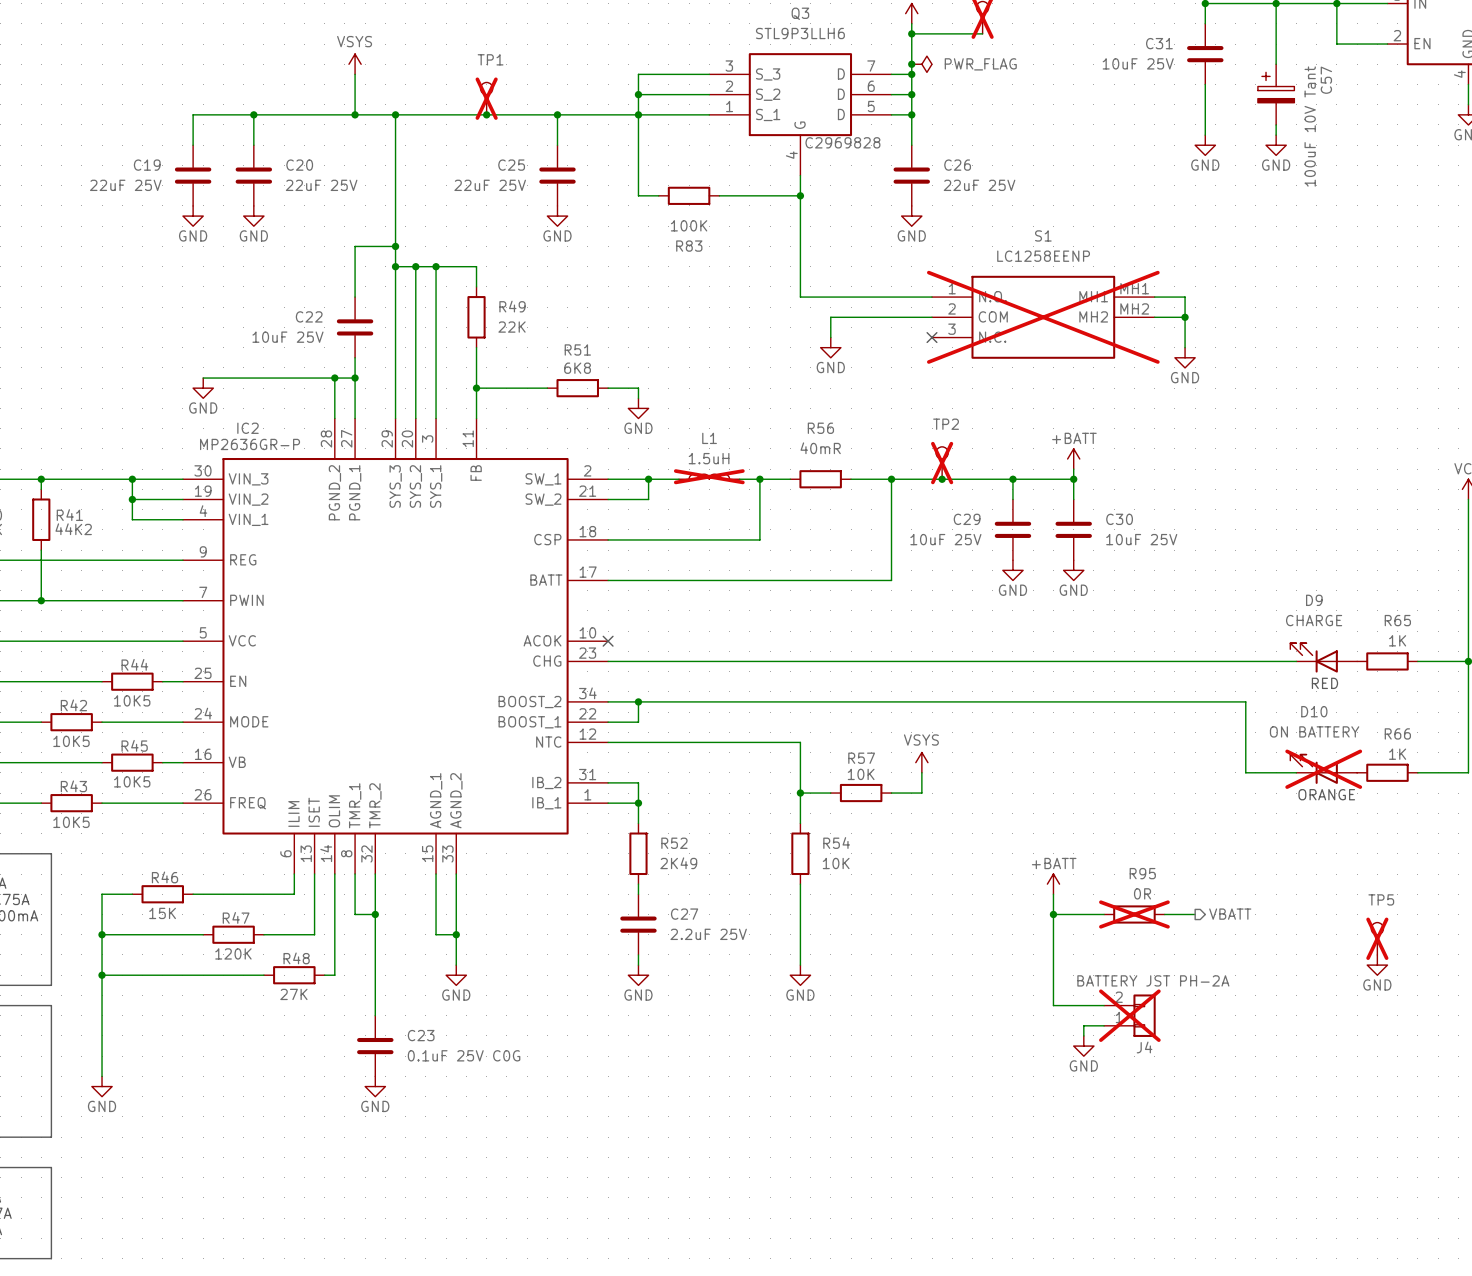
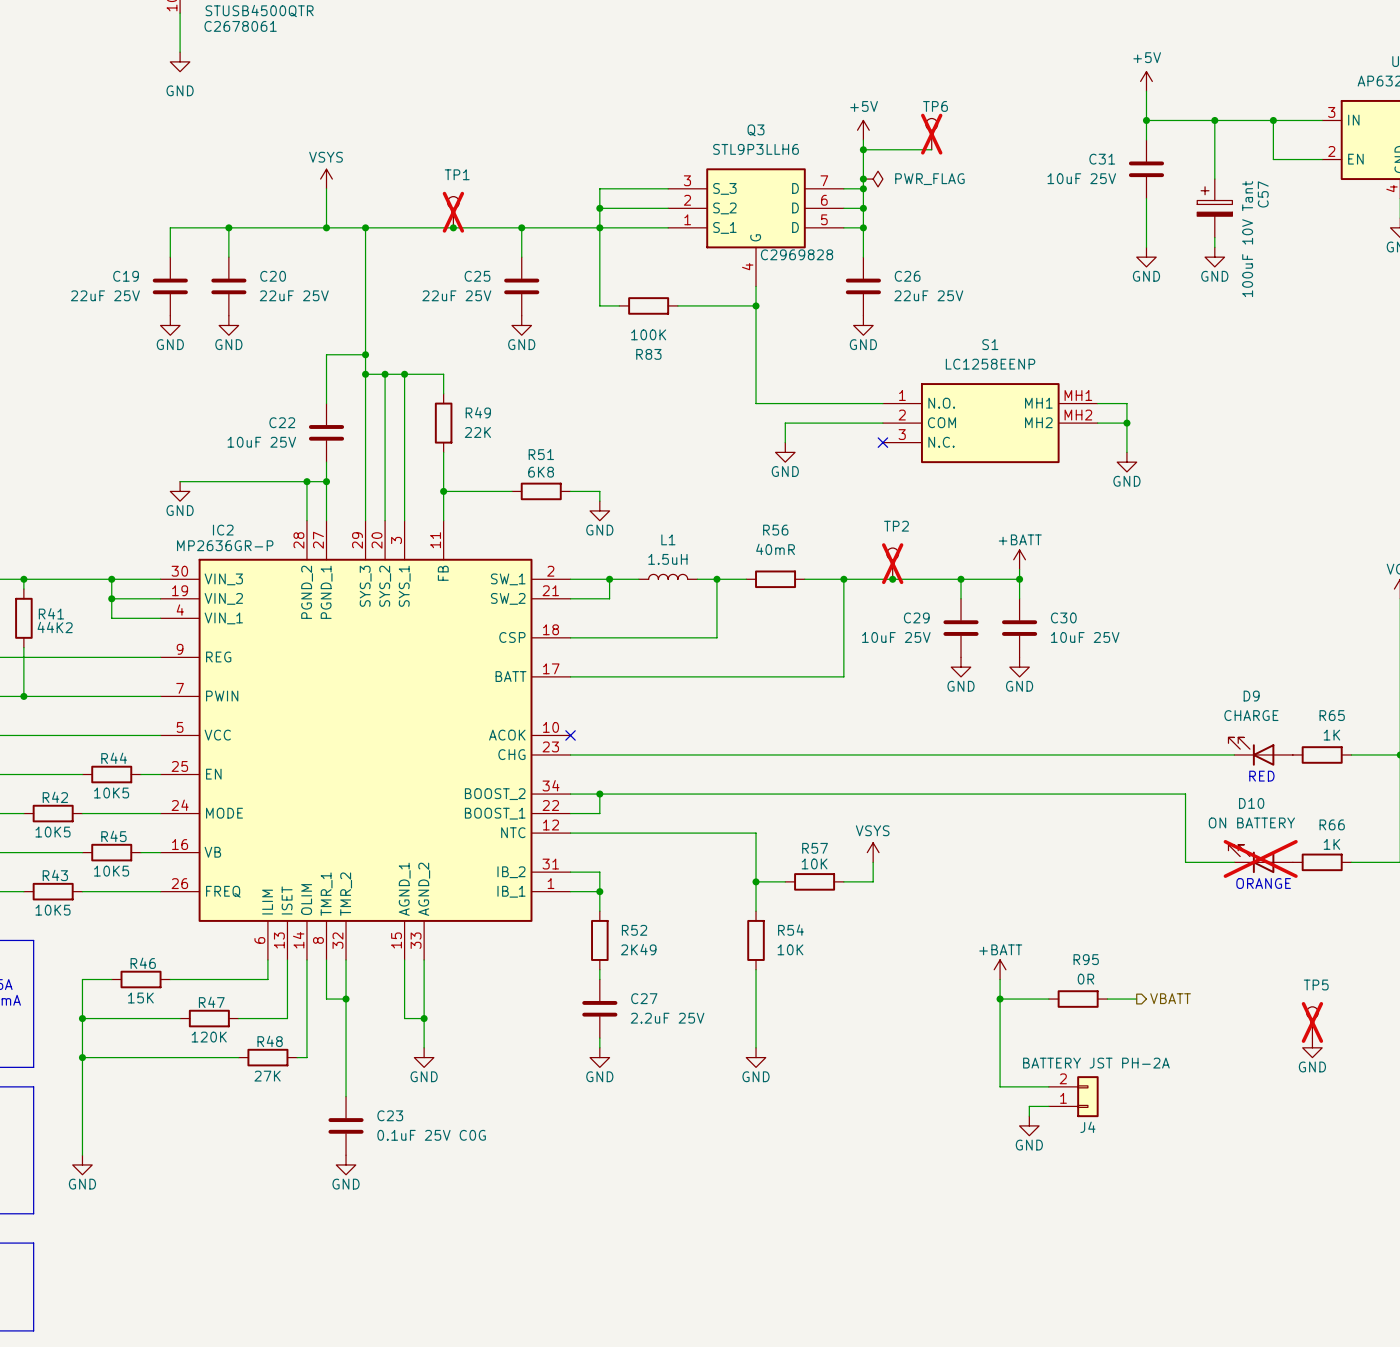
S1 do-not-place cross: (1043, 317) -> none
L1 do-not-place cross: (709, 476) -> none
R95 do-not-place cross: (1134, 914) -> none
J4 do-not-place cross: (1129, 1015) -> none

